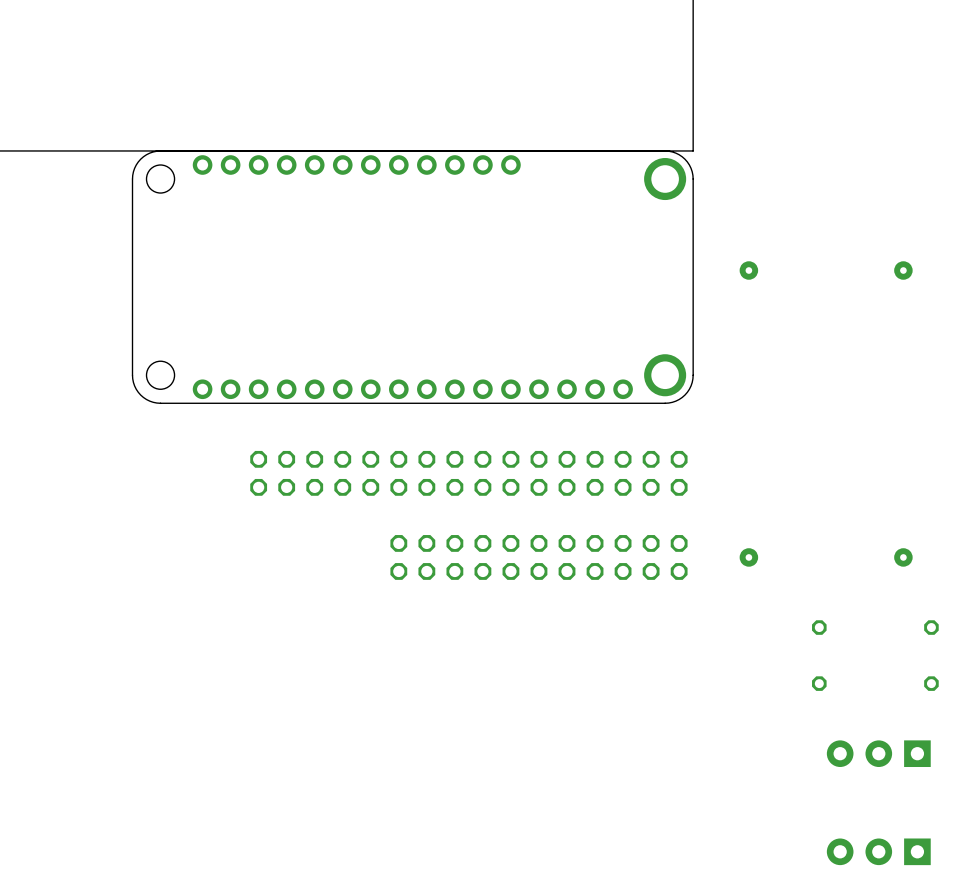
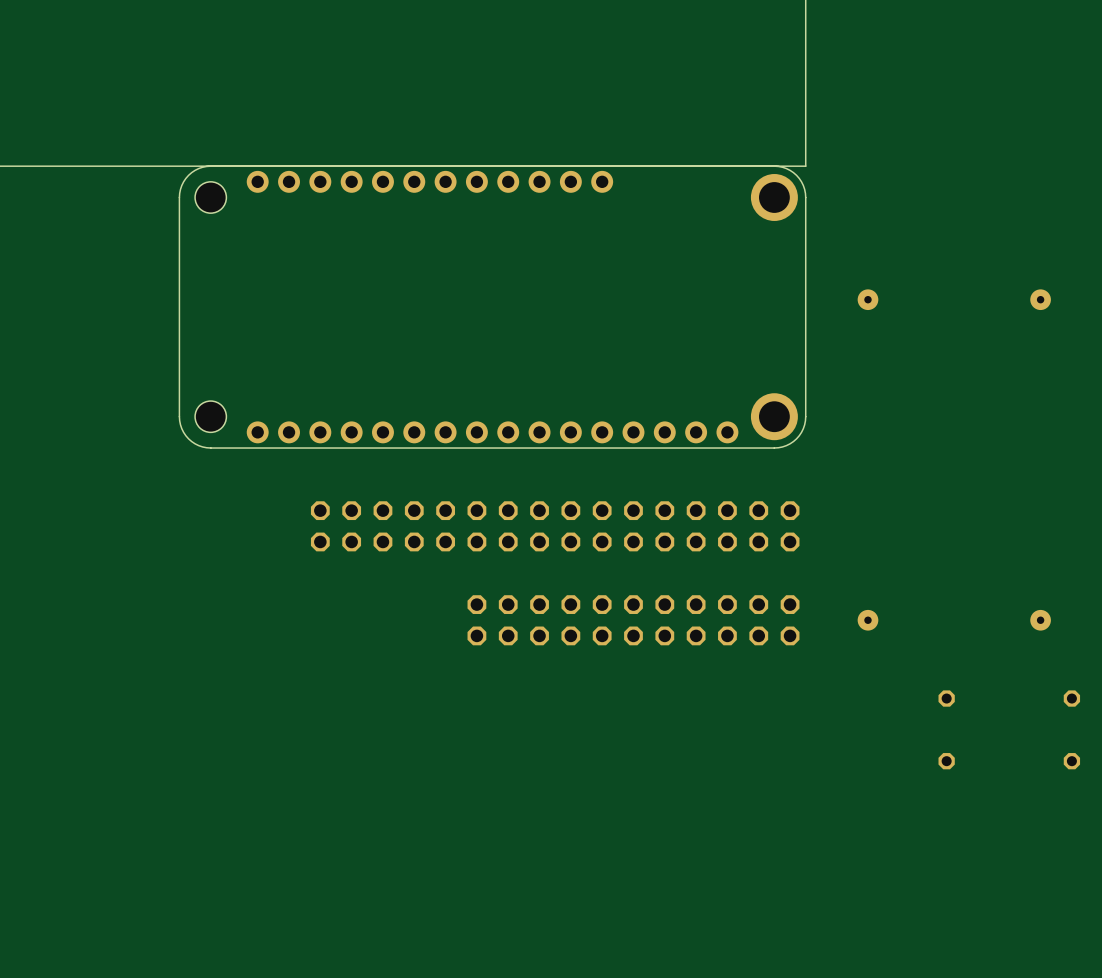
part: (878, 753) -> none
part: (878, 851) -> none

